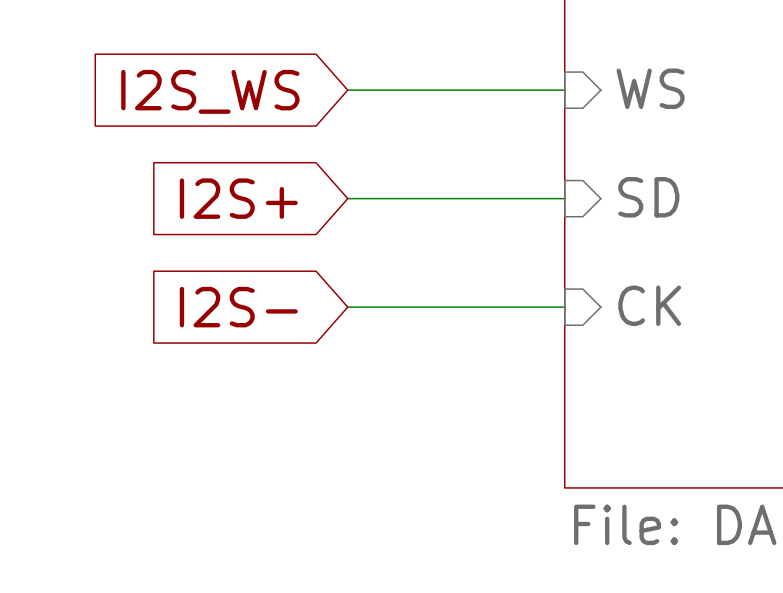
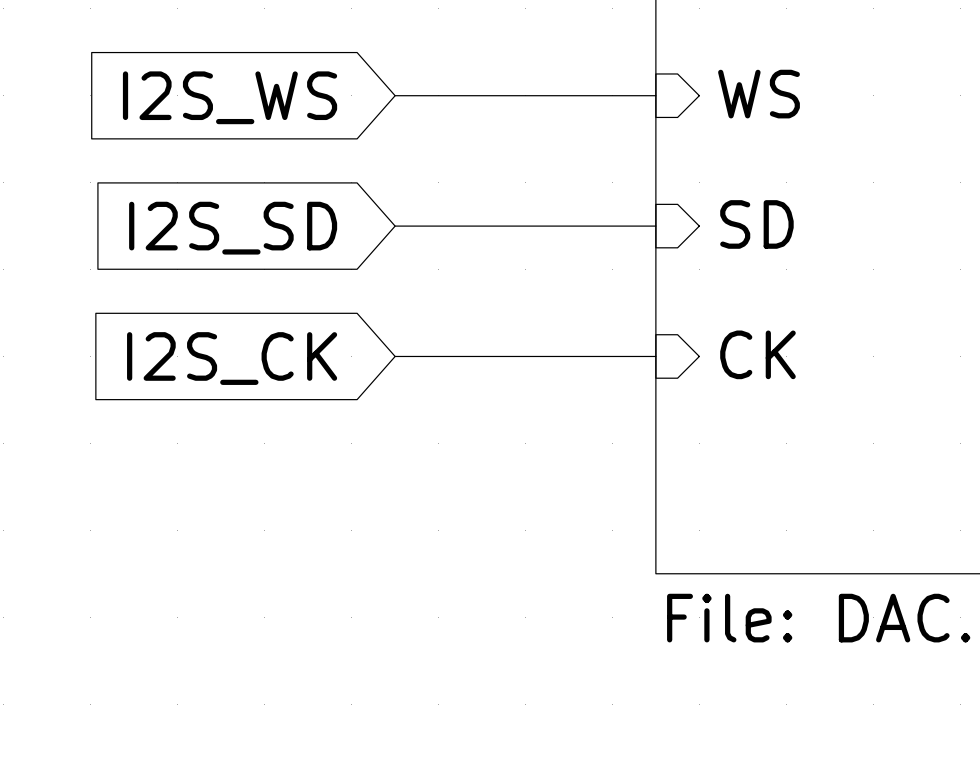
global label: I2S+ (238, 198) -> I2S_SD (233, 228)
global label: I2S- (238, 307) -> I2S_CK (232, 358)

